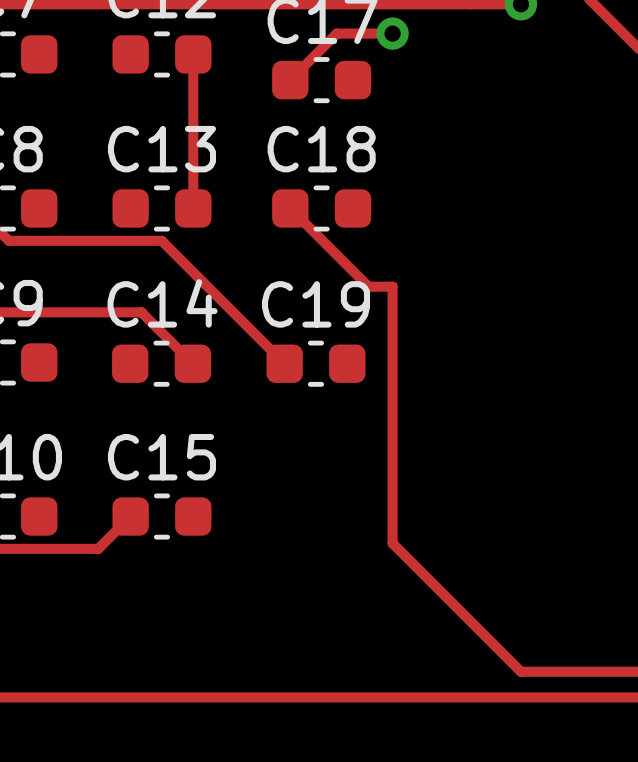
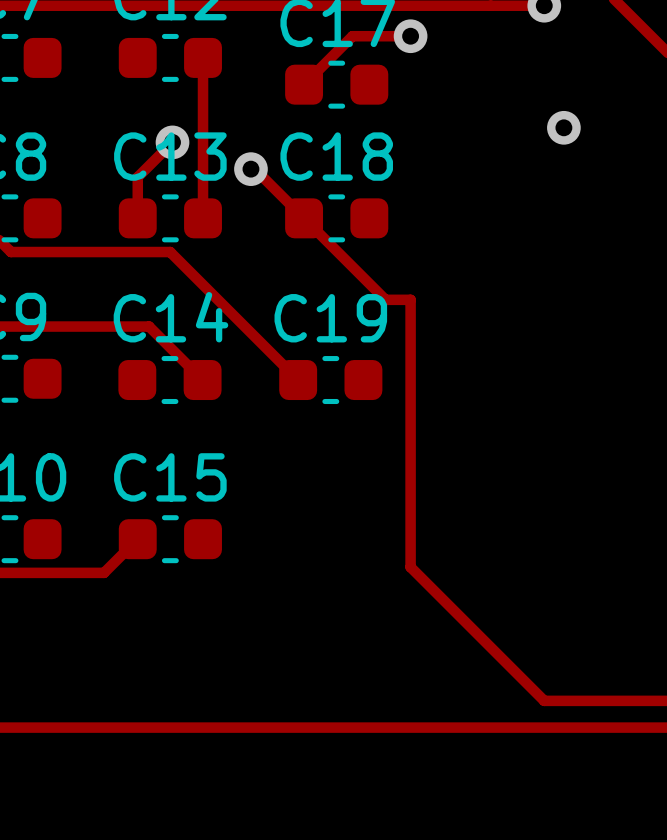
via: none -> (563, 127)
track: none -> (172, 142) (137, 177) (137, 218)
via: none -> (172, 142)
track: none -> (250, 169) (254, 169) (304, 218)
via: none -> (250, 169)

